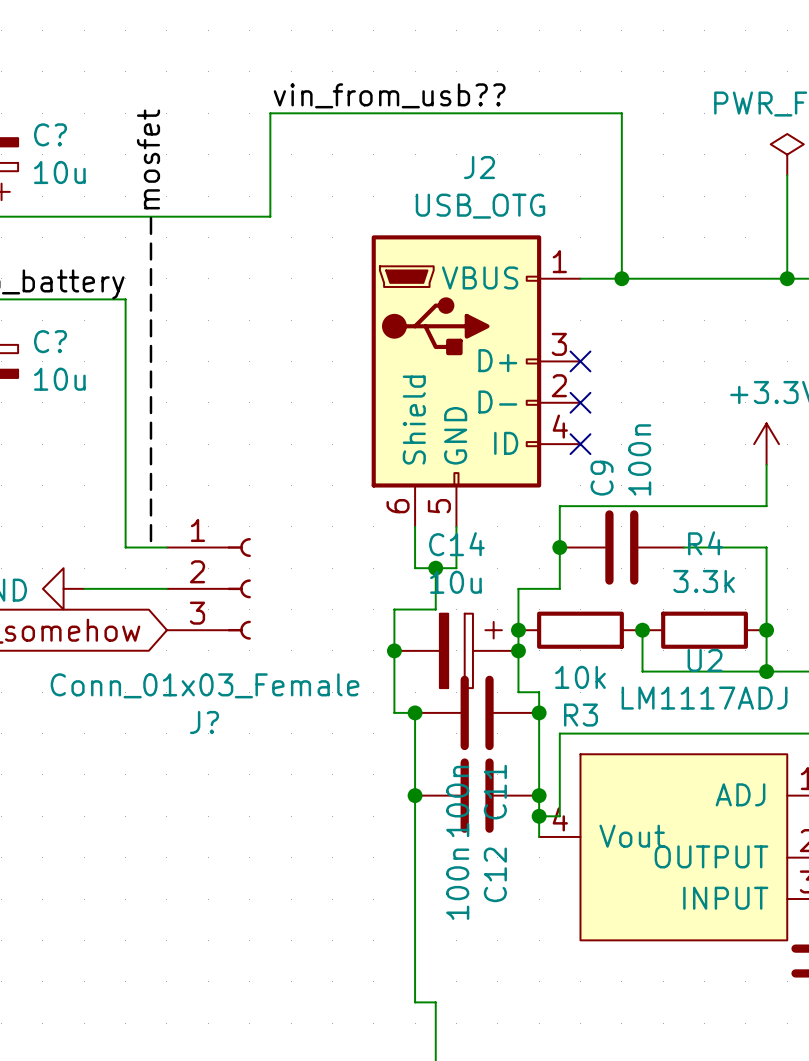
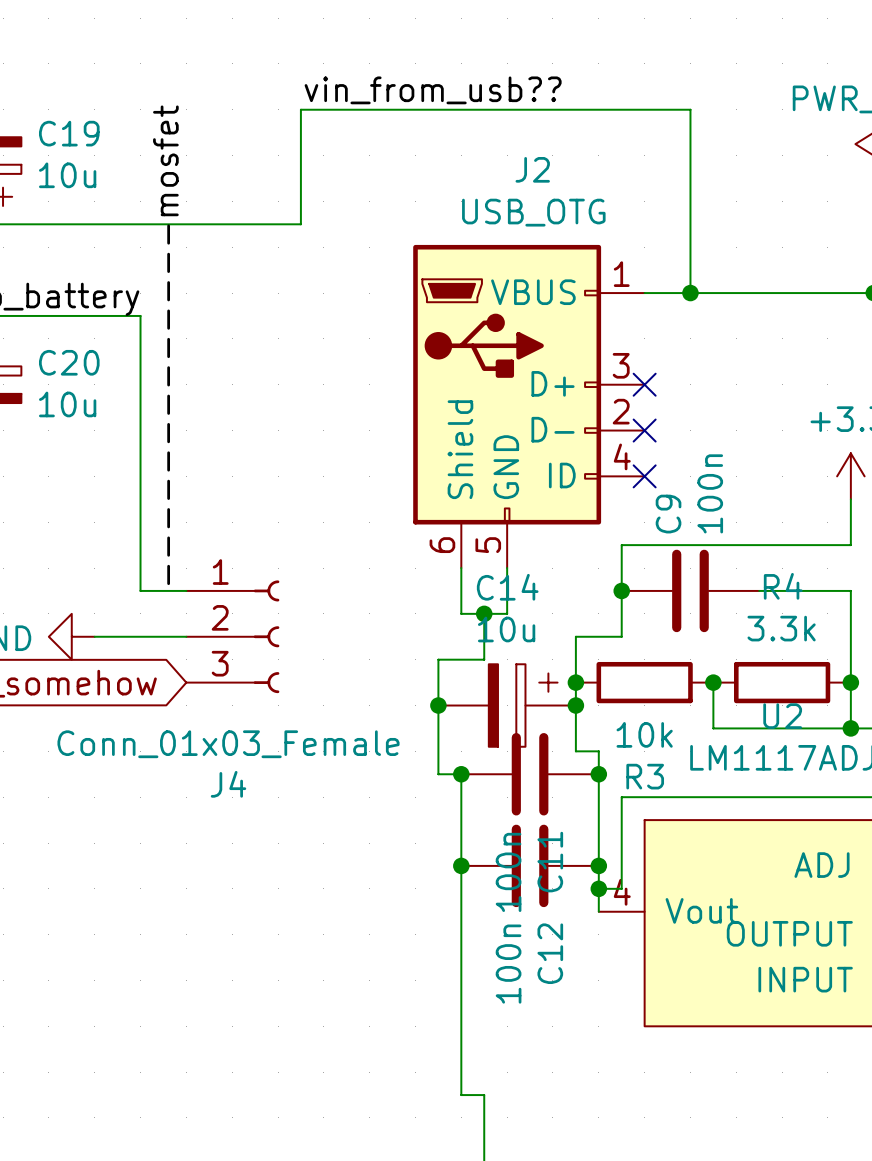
C? name: C? (50, 134) -> C19 (69, 133)
C? name: C? (50, 341) -> C20 (69, 362)
J? name: J? (204, 722) -> J4 (228, 784)

